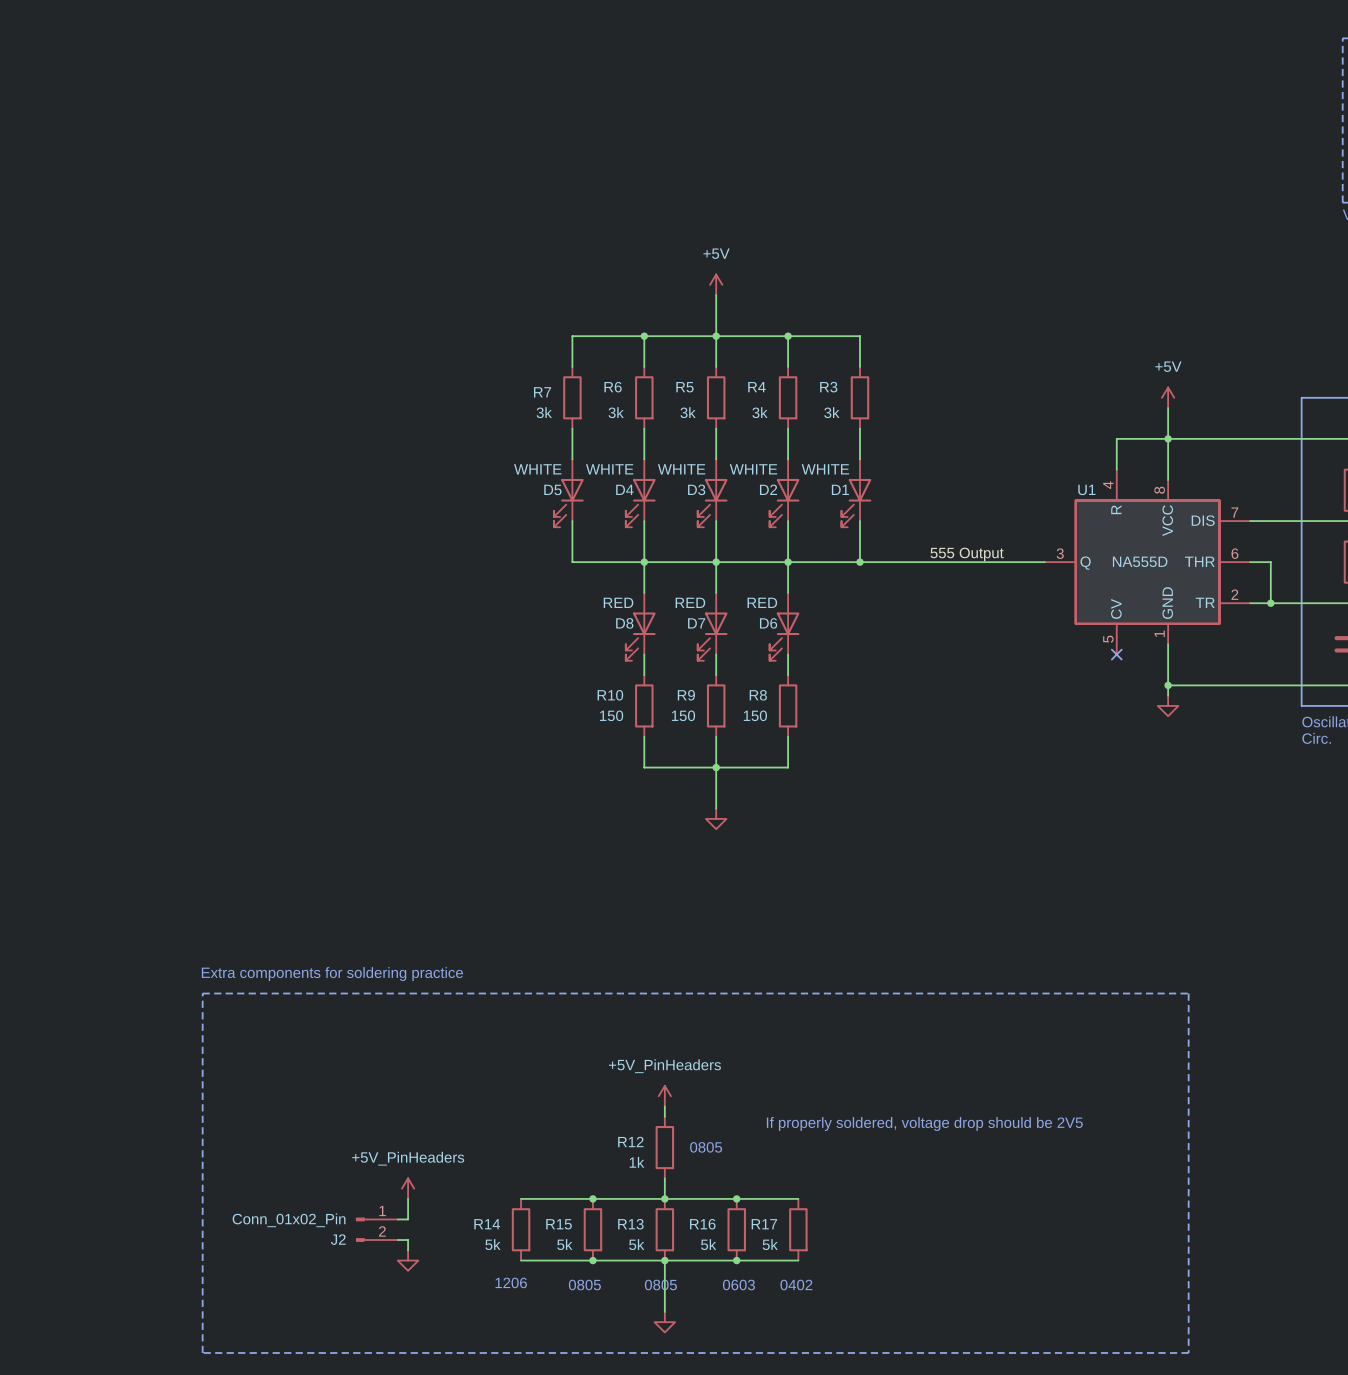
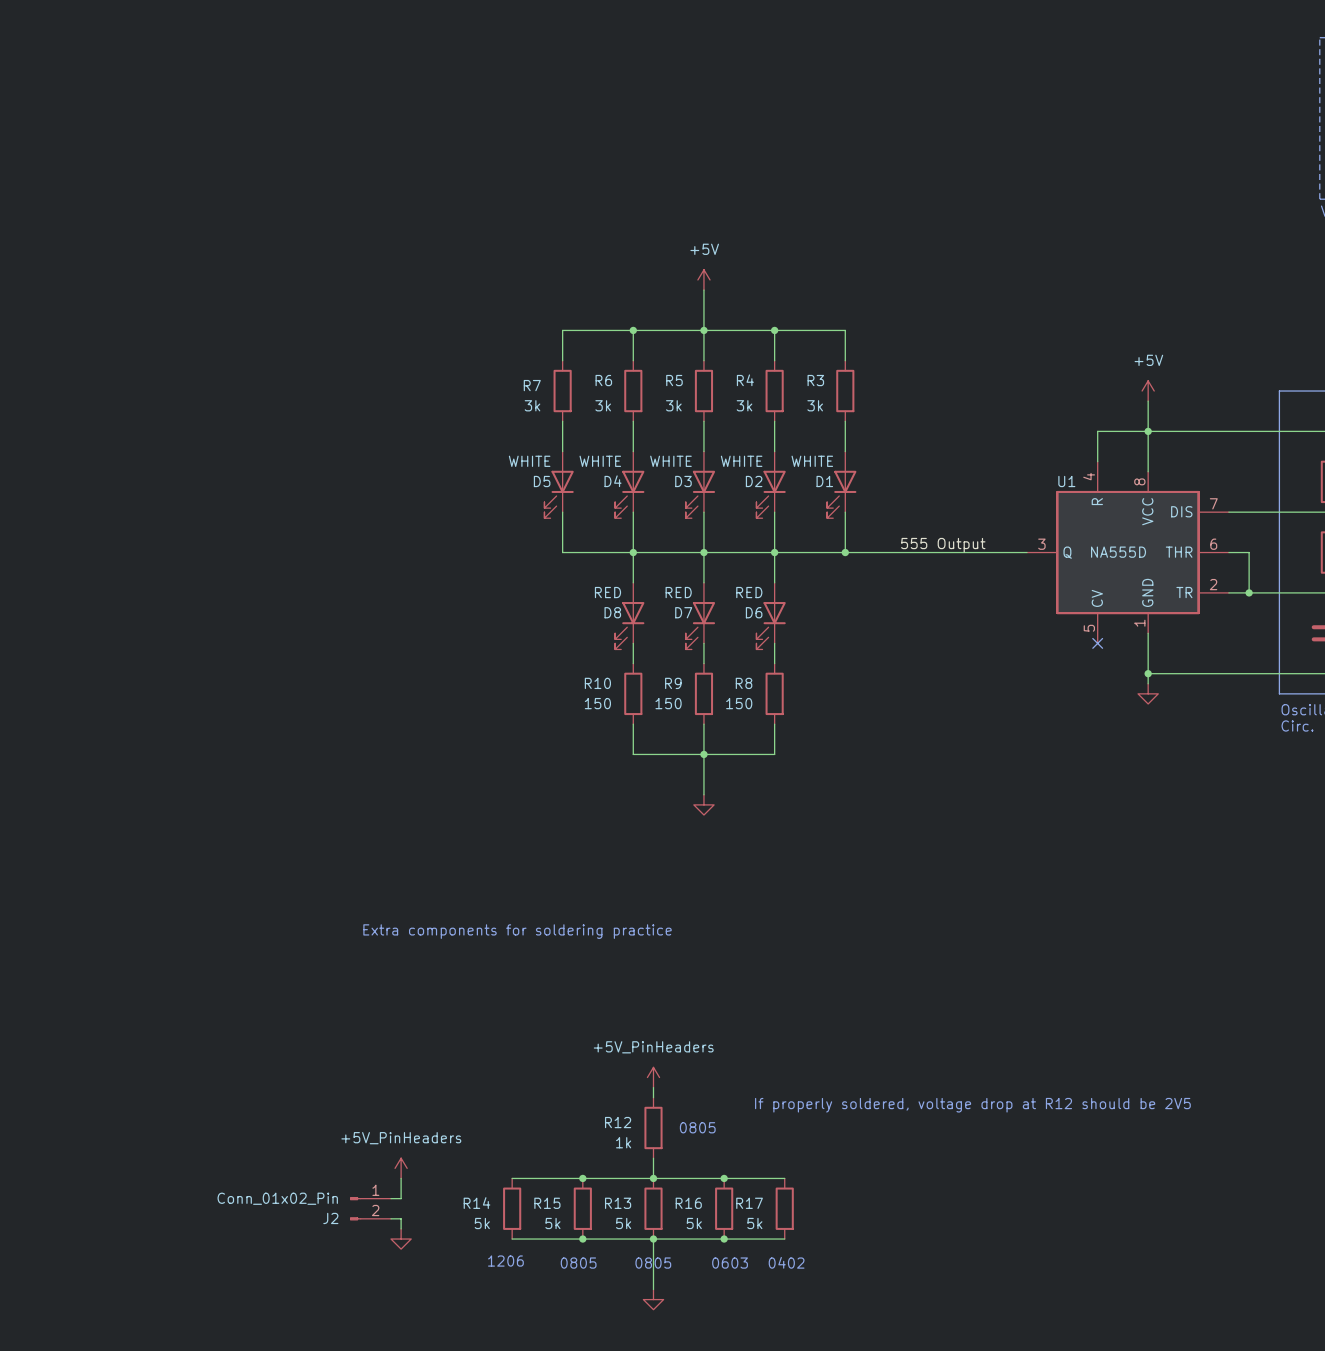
text position: Extra components for soldering practice (332, 974) -> Extra components for soldering practice (517, 931)
line: (202, 993) (1188, 993) (1188, 1352) (202, 1352) (202, 993) -> none
text: If properly soldered, voltage drop should be 2V5 (924, 1124) -> If properly soldered, voltage drop at R12 should be 2V5 (972, 1105)

